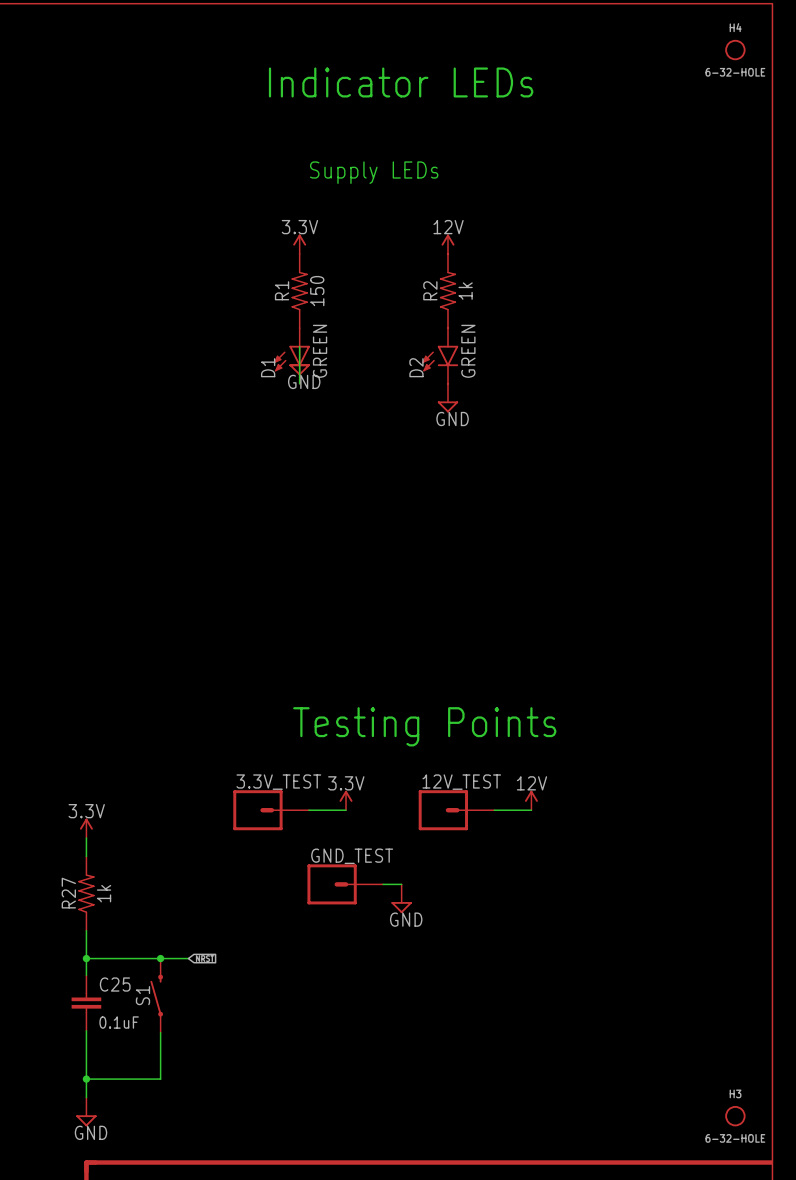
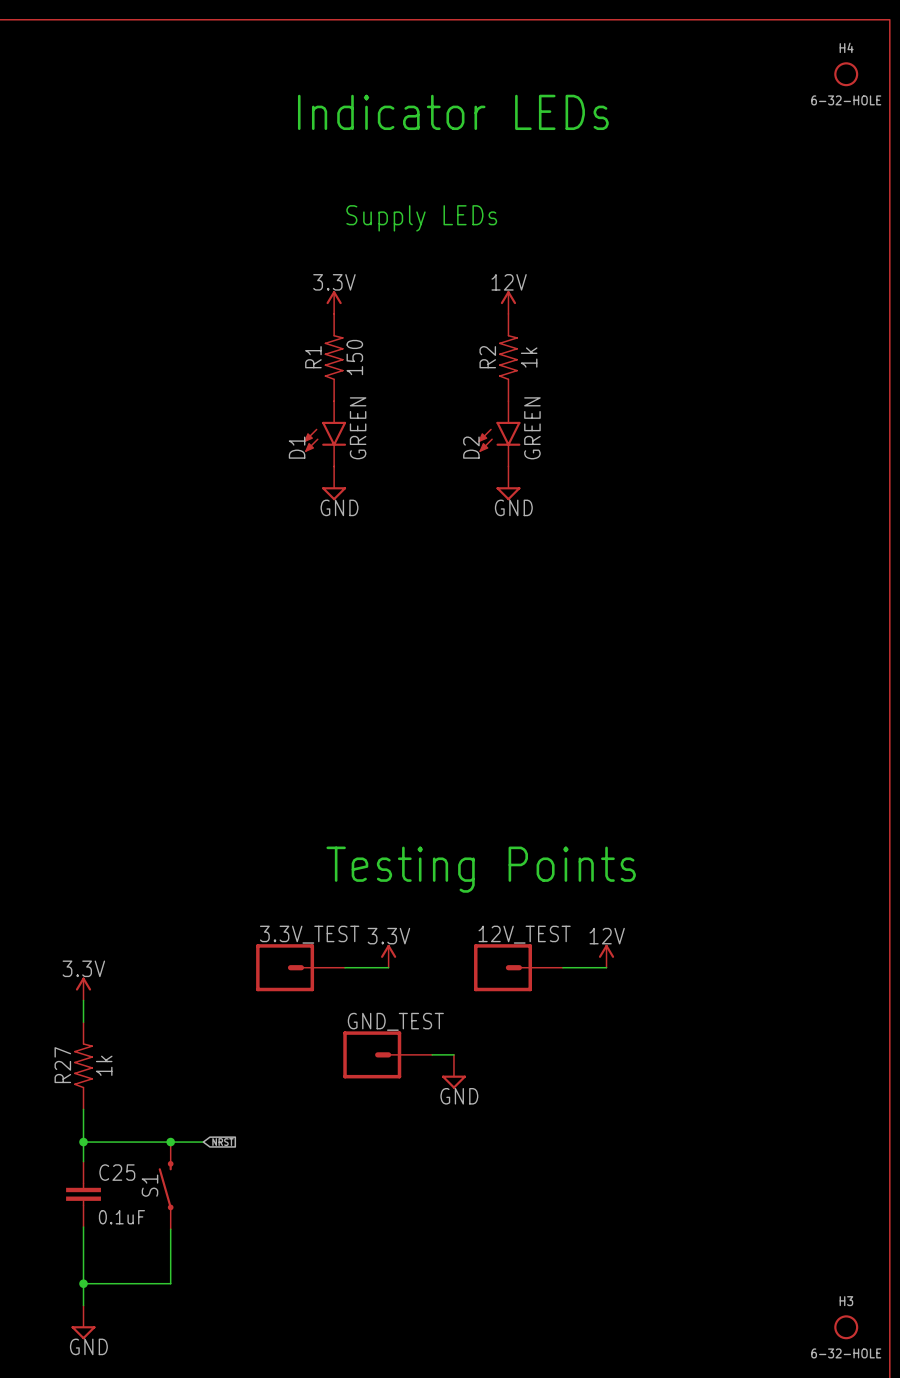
power symbol position: GND (299, 361) -> GND (334, 483)

